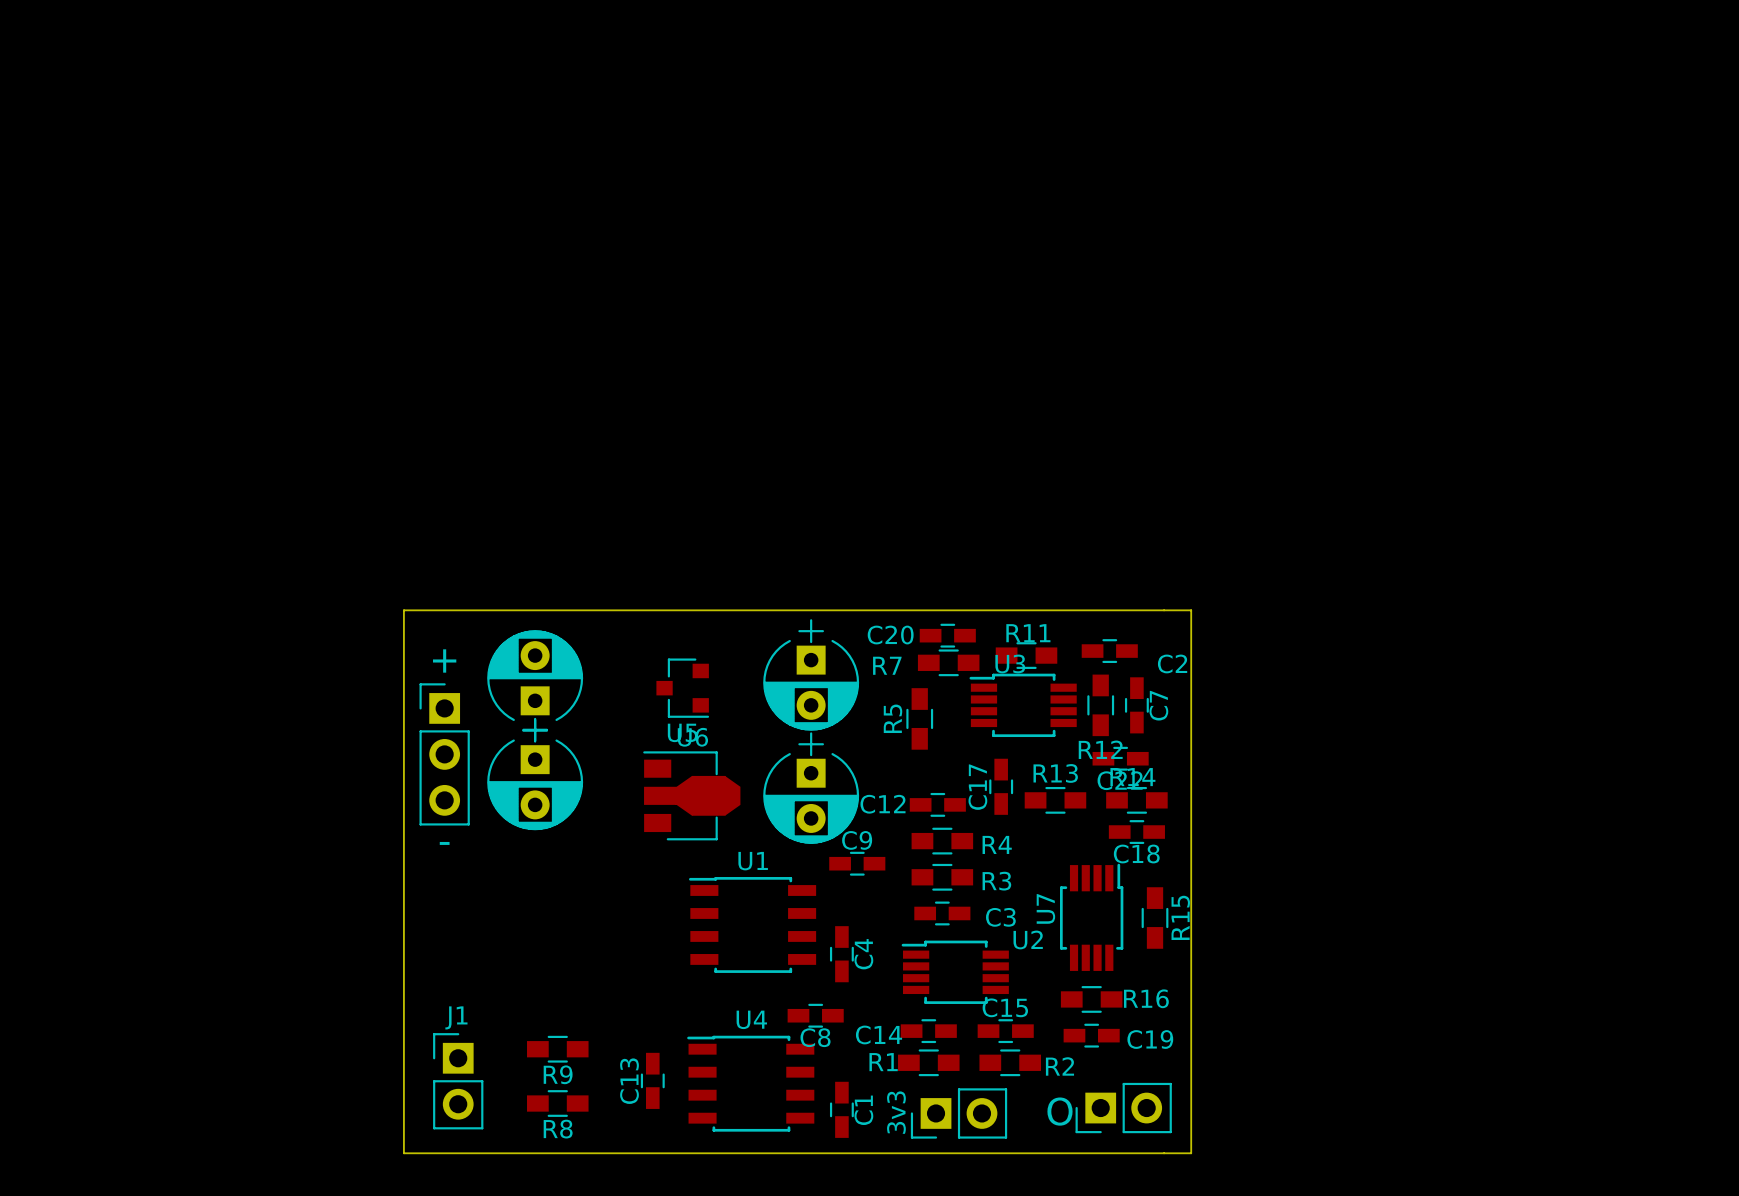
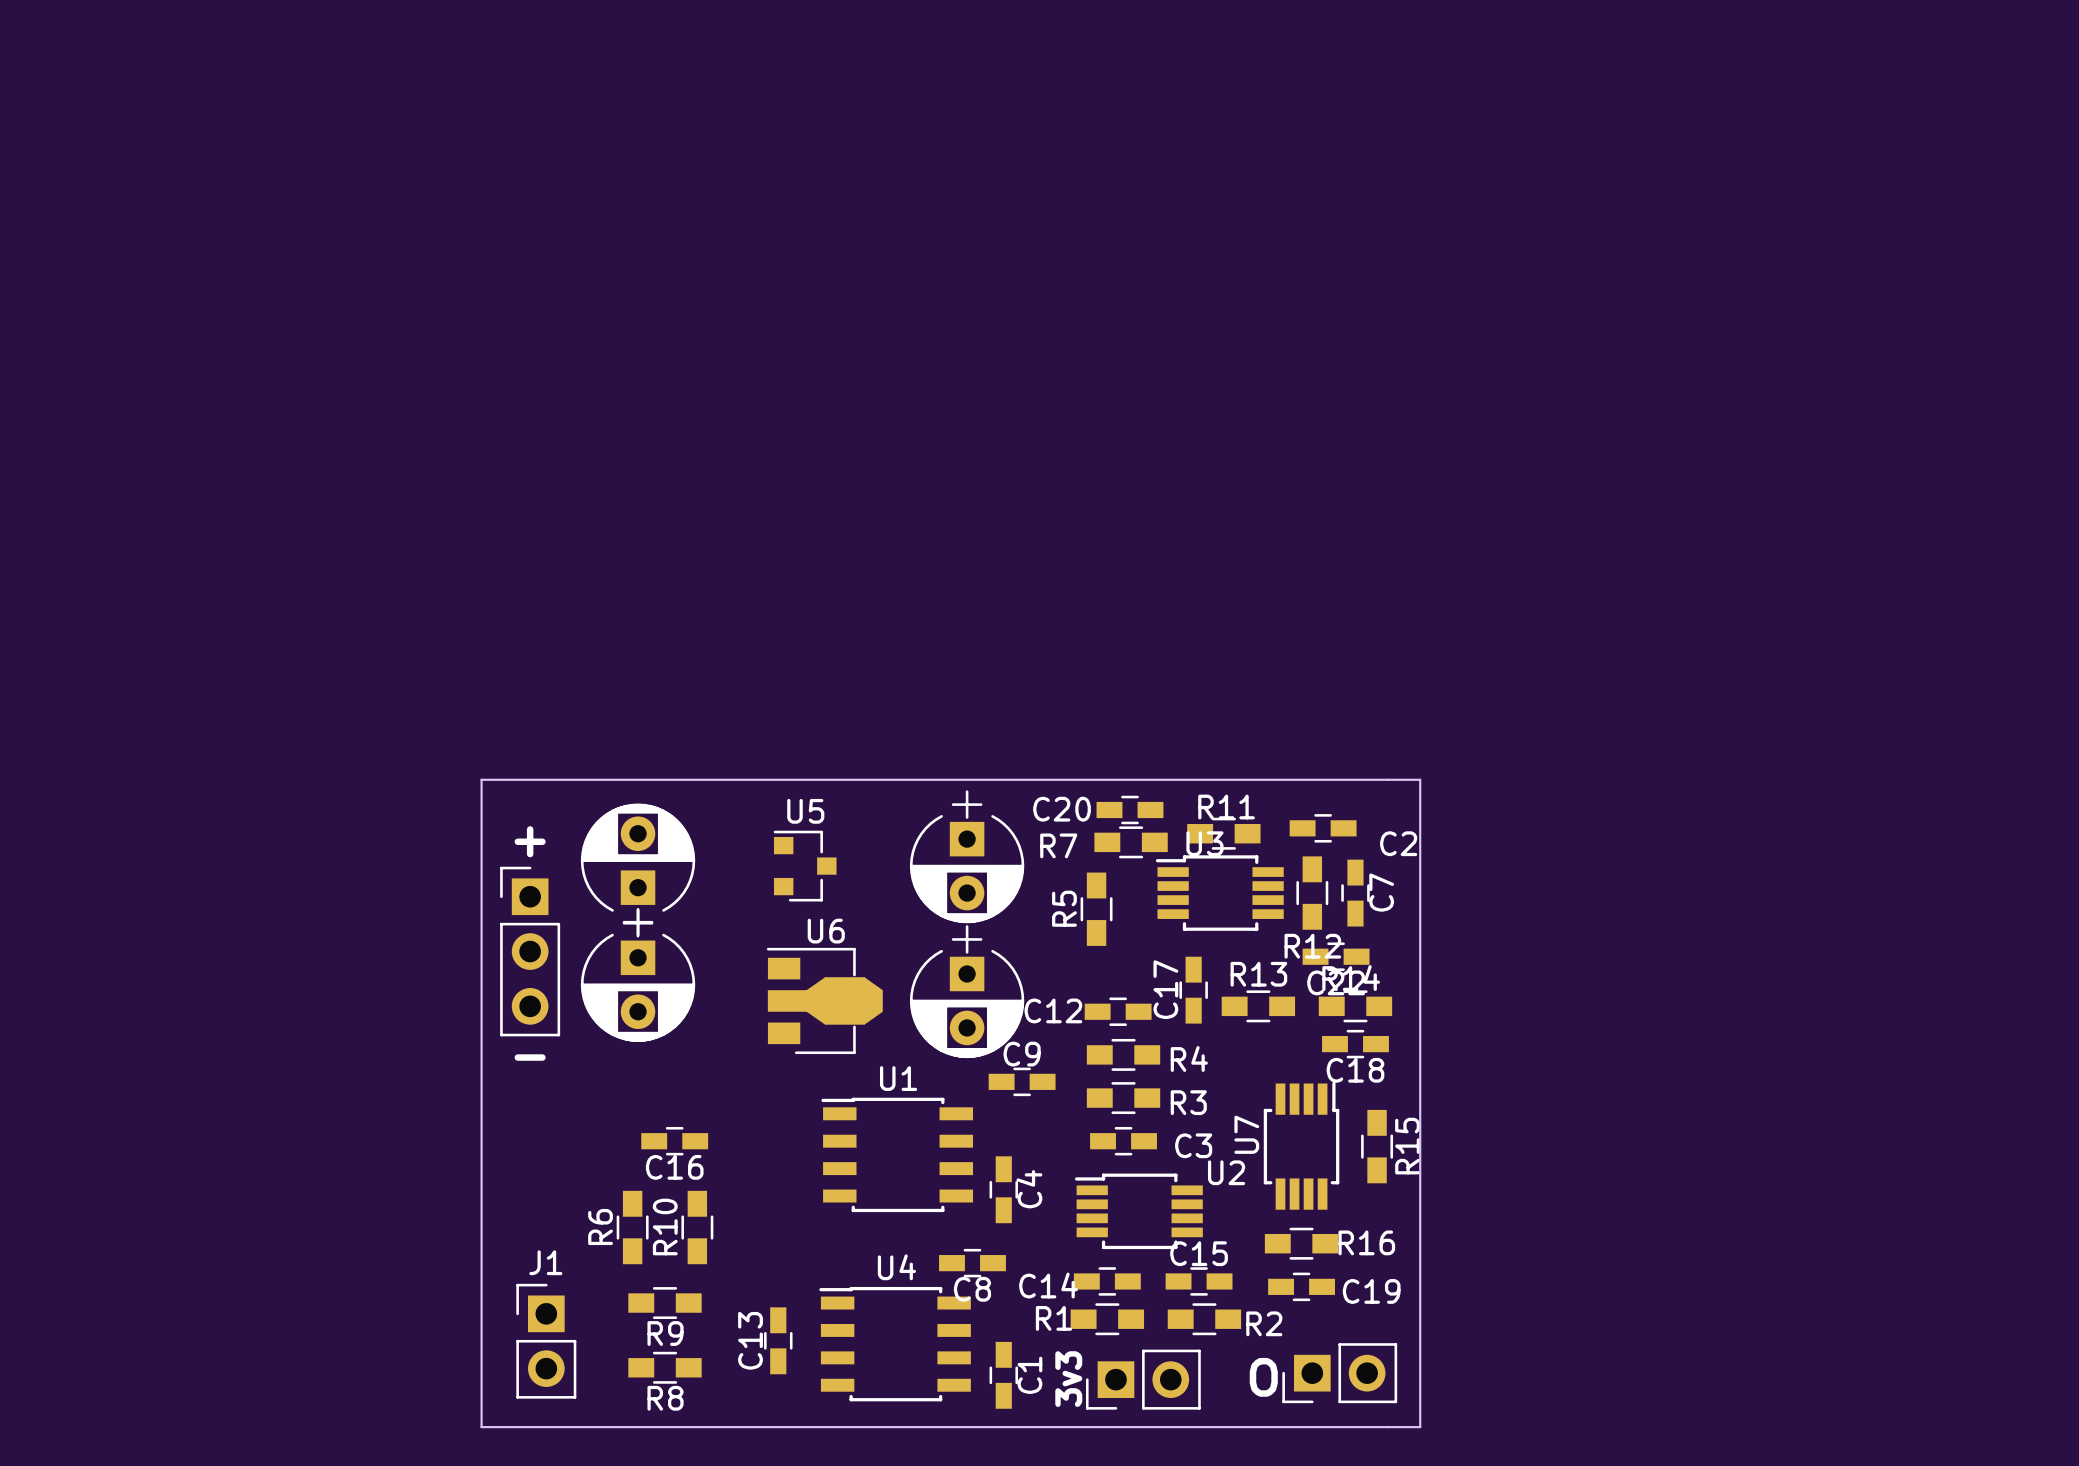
U5 rotation: 0° (682, 688) -> 180° (805, 866)
C16: none -> (674, 1141)
R6: none -> (632, 1227)
R10: none -> (697, 1227)

